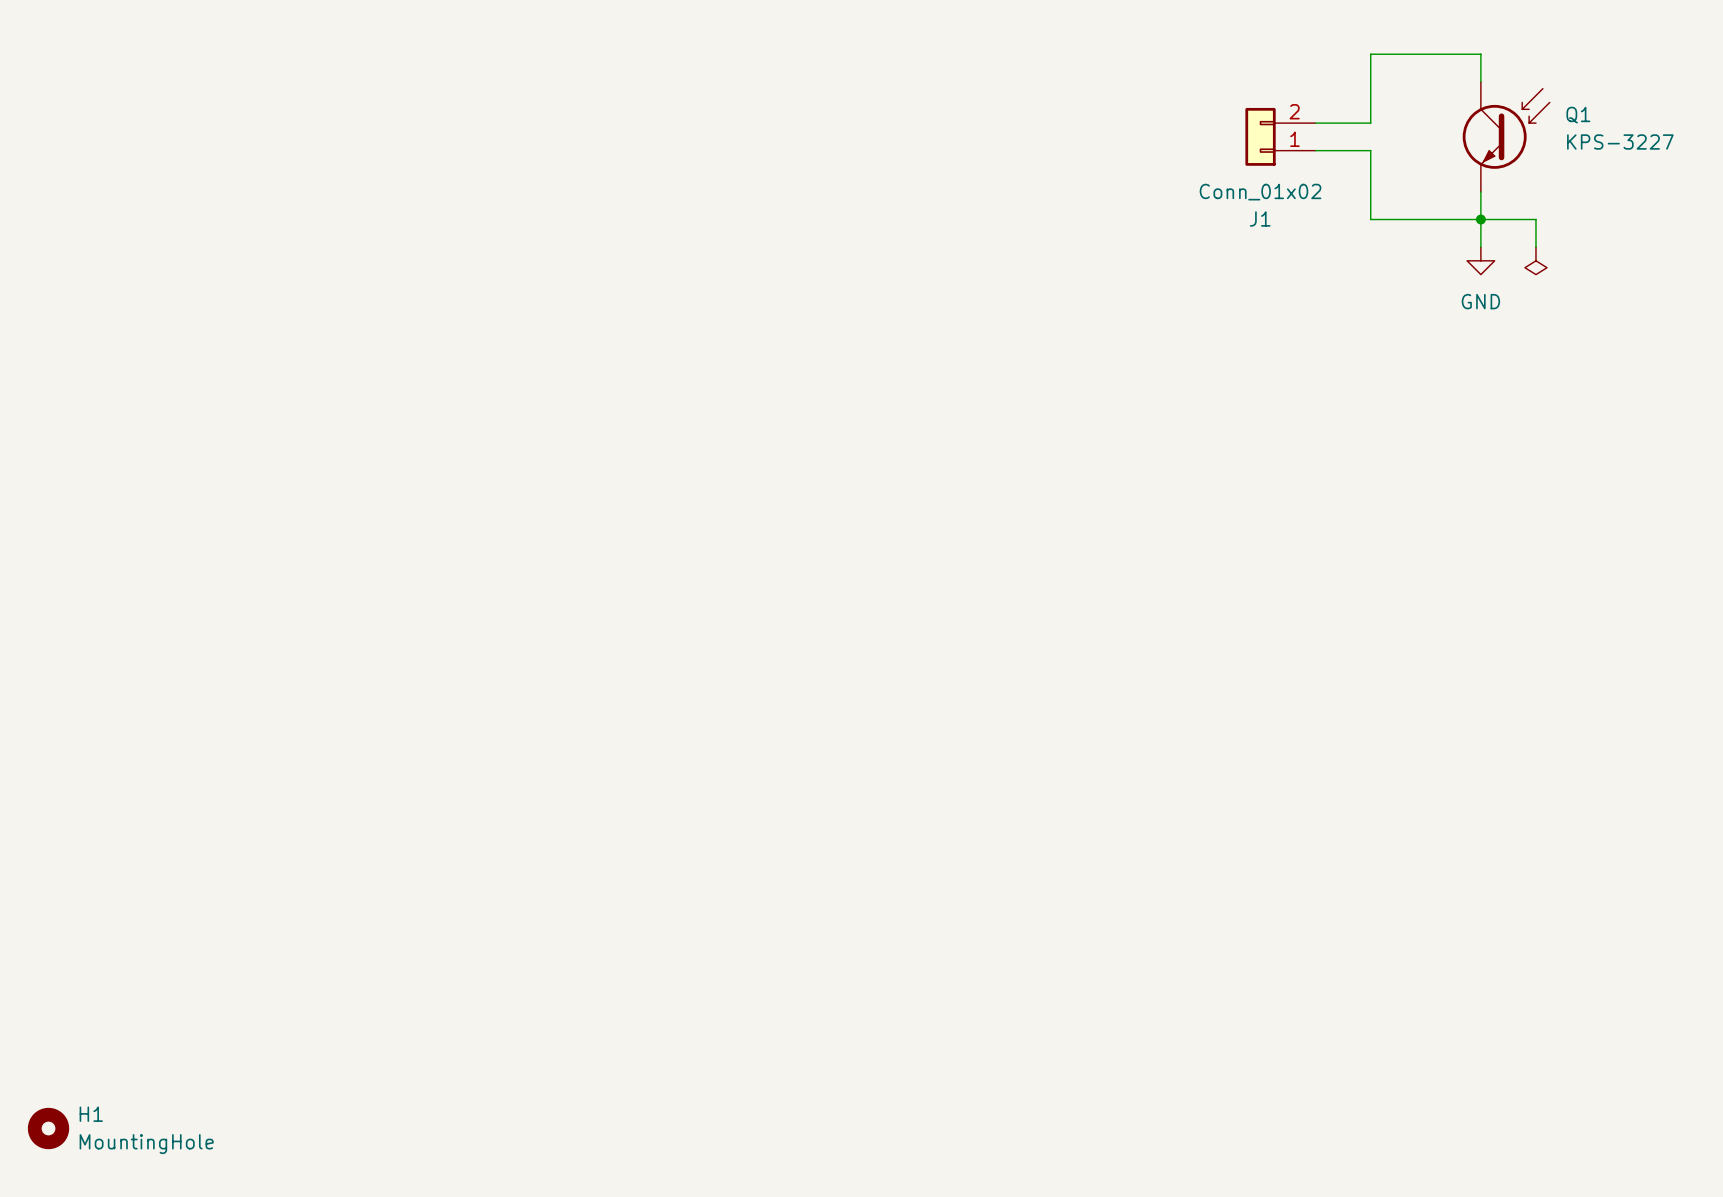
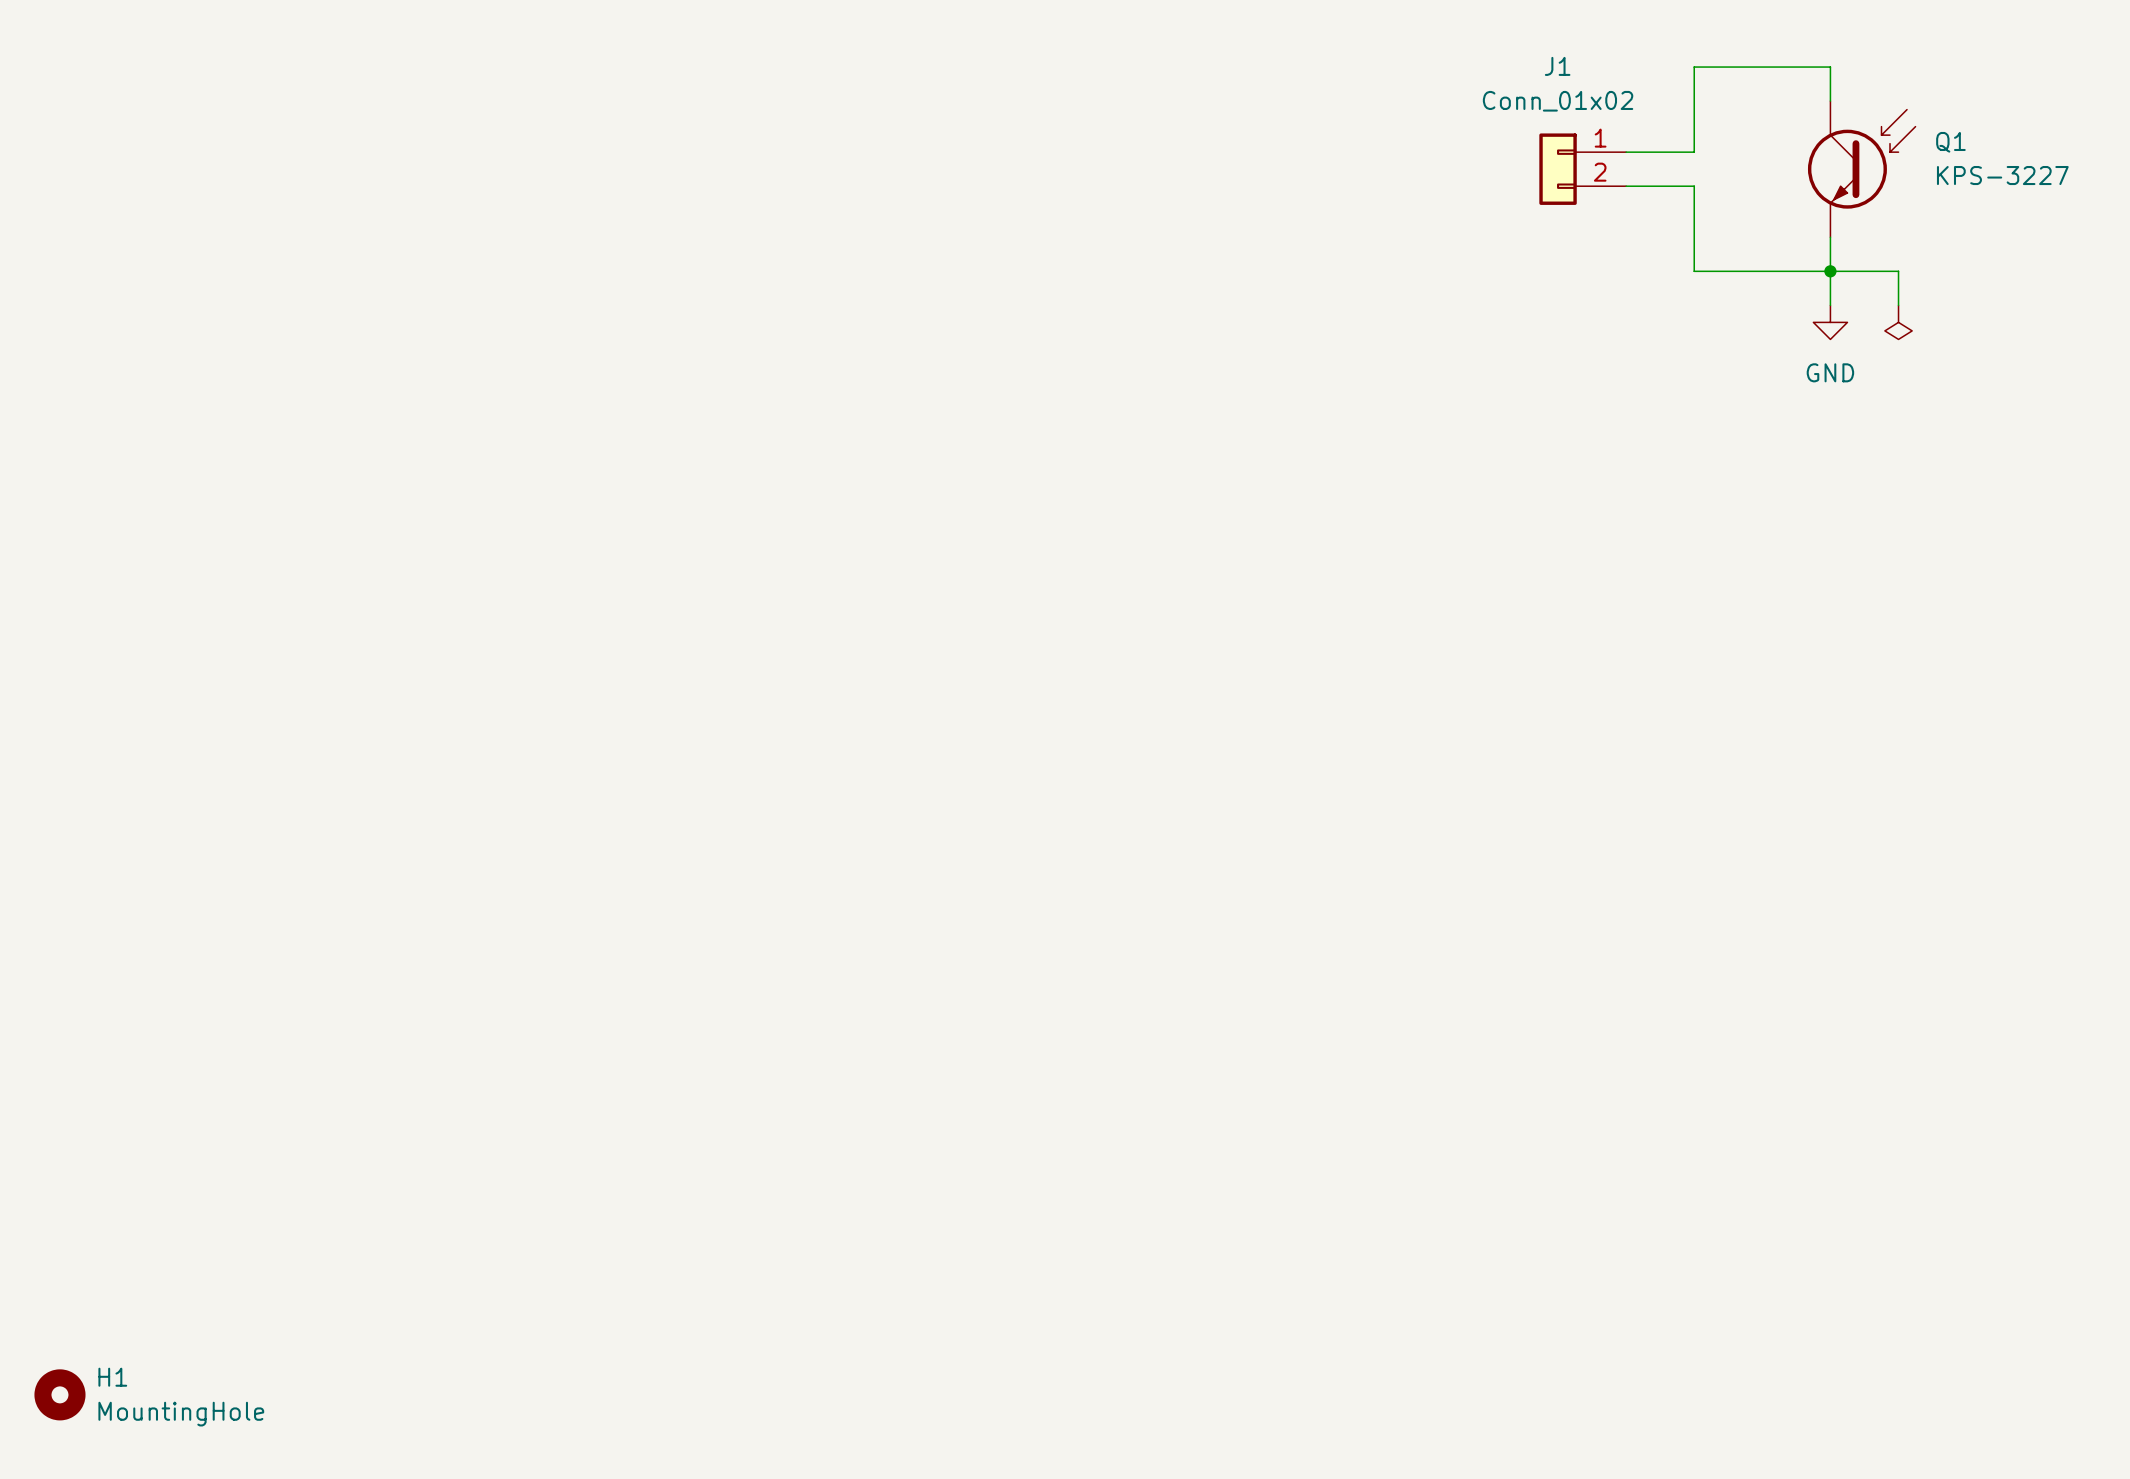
J1 flip: as is (1260, 136) -> up-down (1558, 169)

